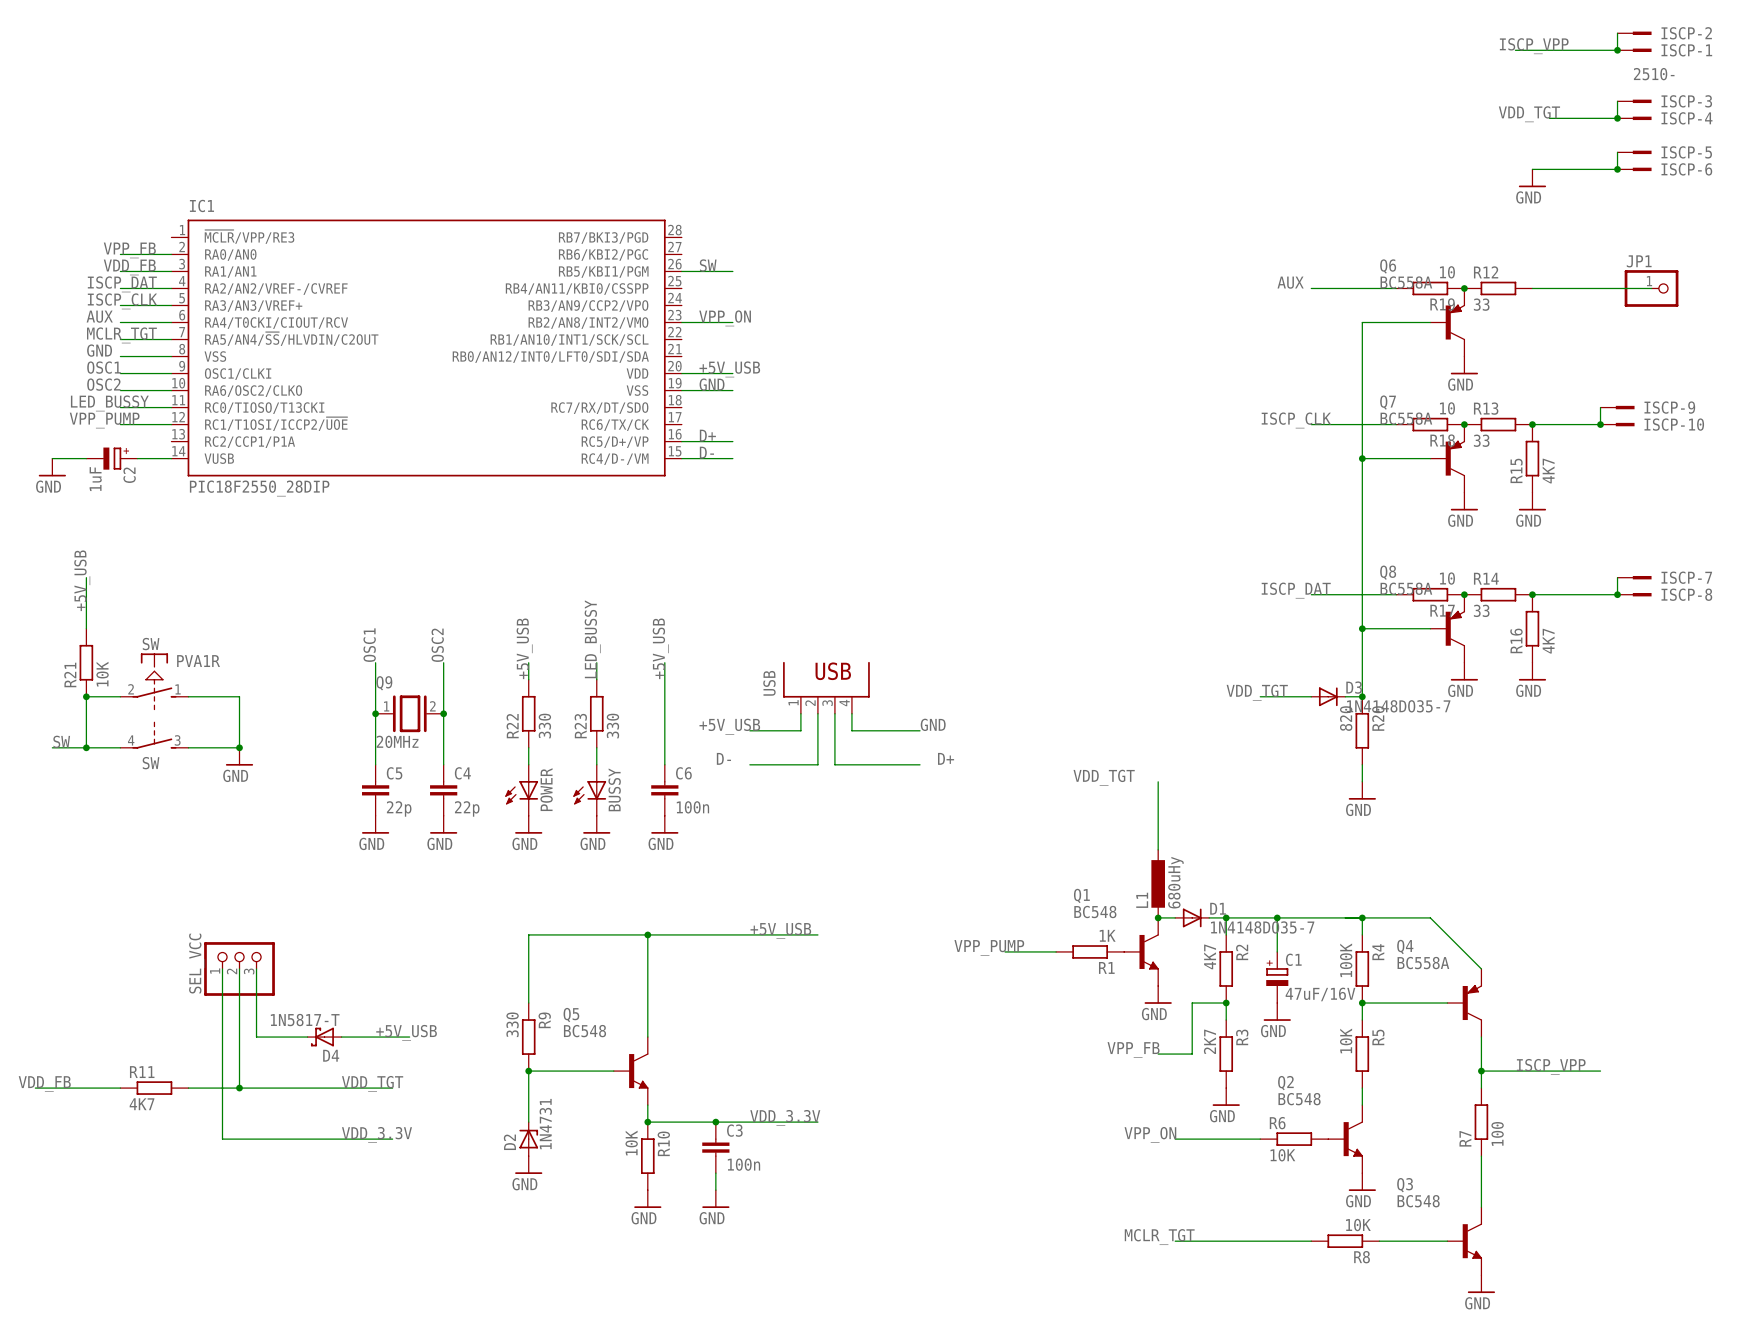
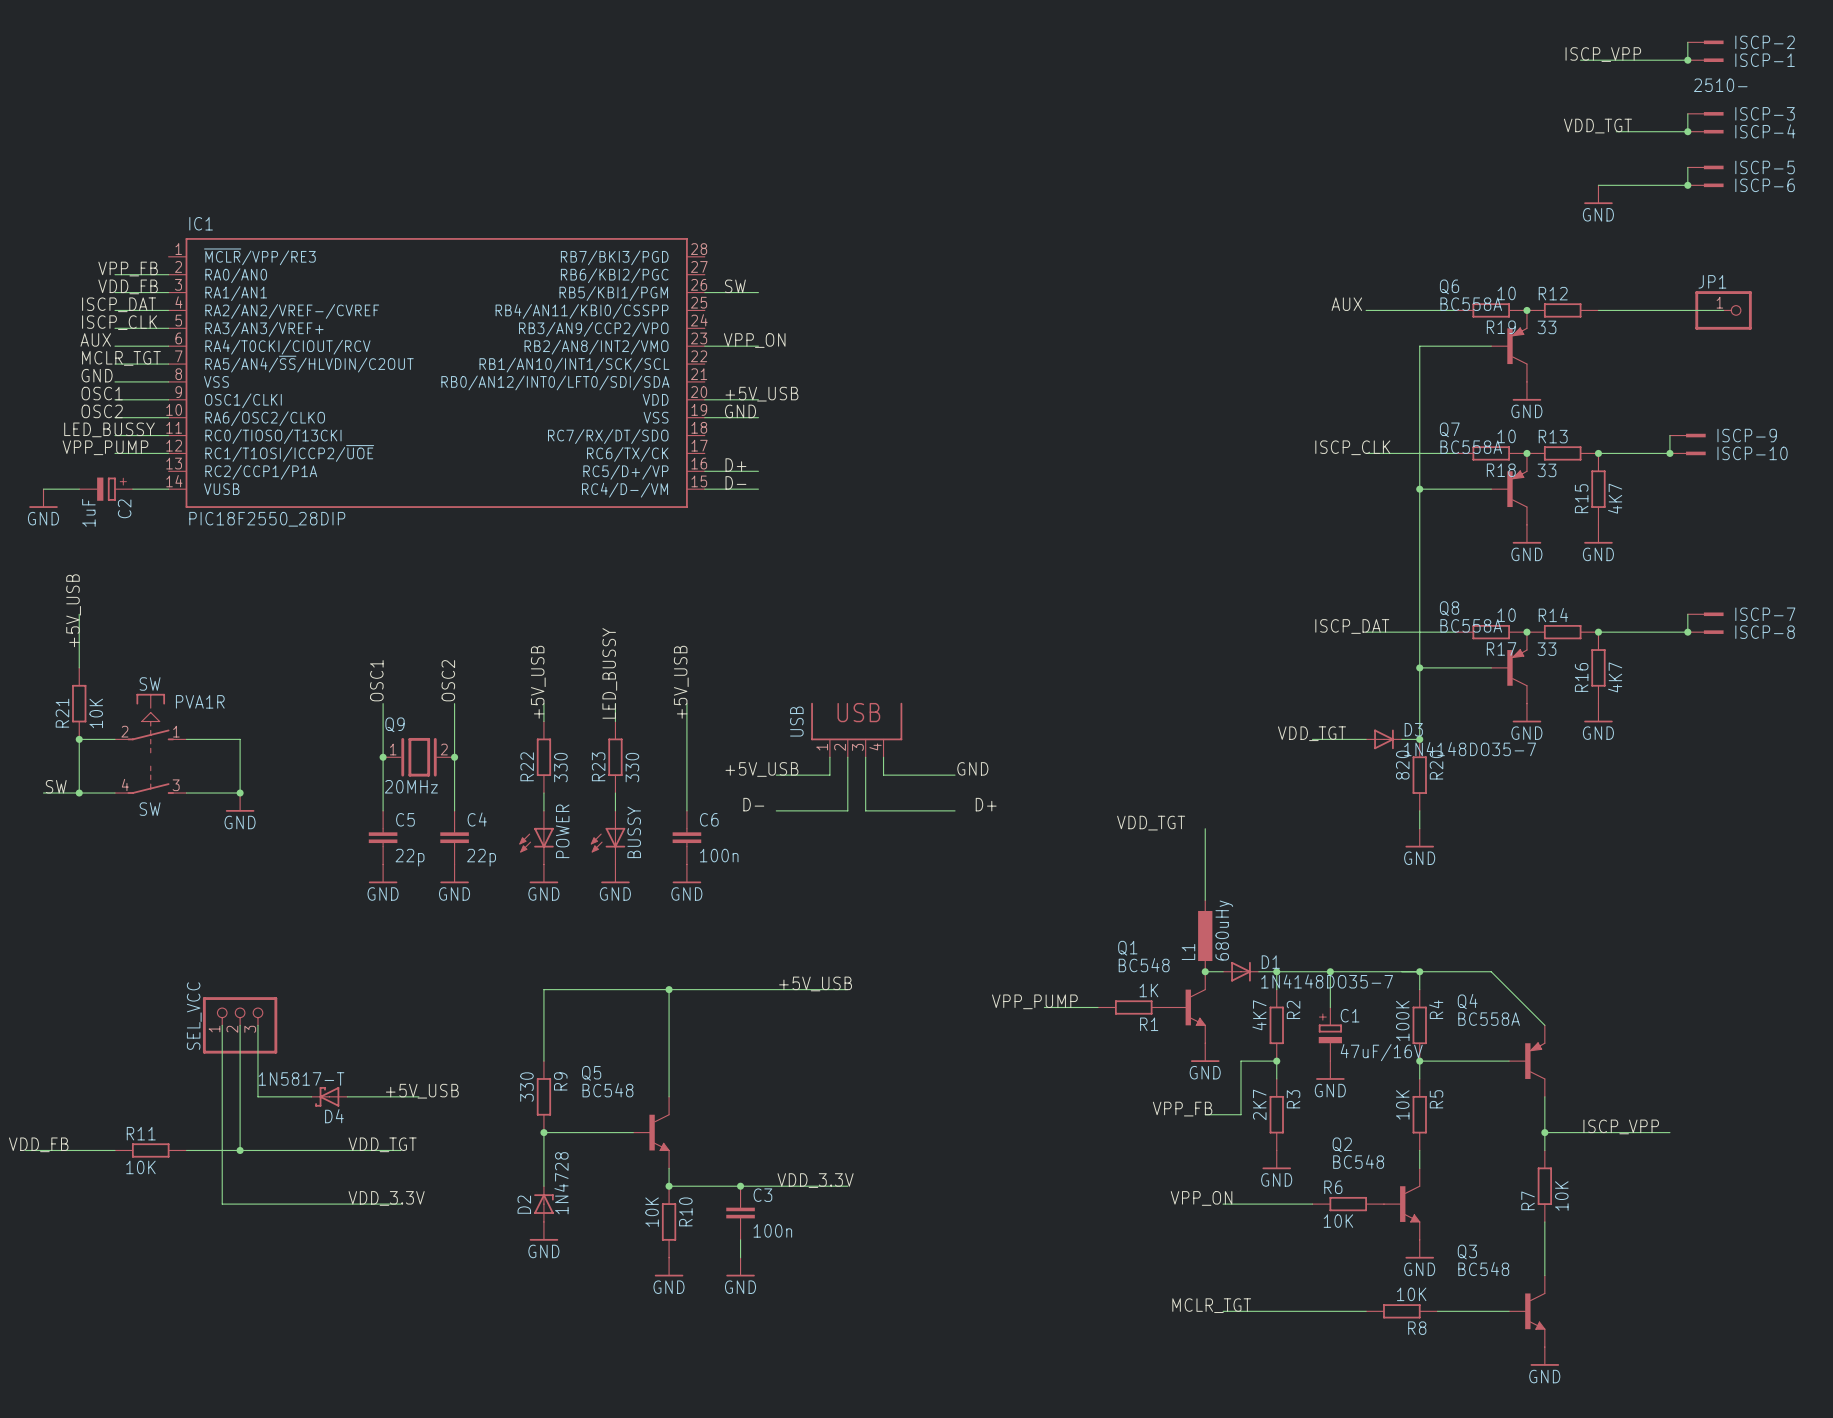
R11 value: 4K7 (142, 1104) -> 10K (140, 1167)
D2 value: 1N4731 (545, 1124) -> 1N4728 (561, 1183)
R7 value: 100 (1497, 1133) -> 10K (1561, 1196)

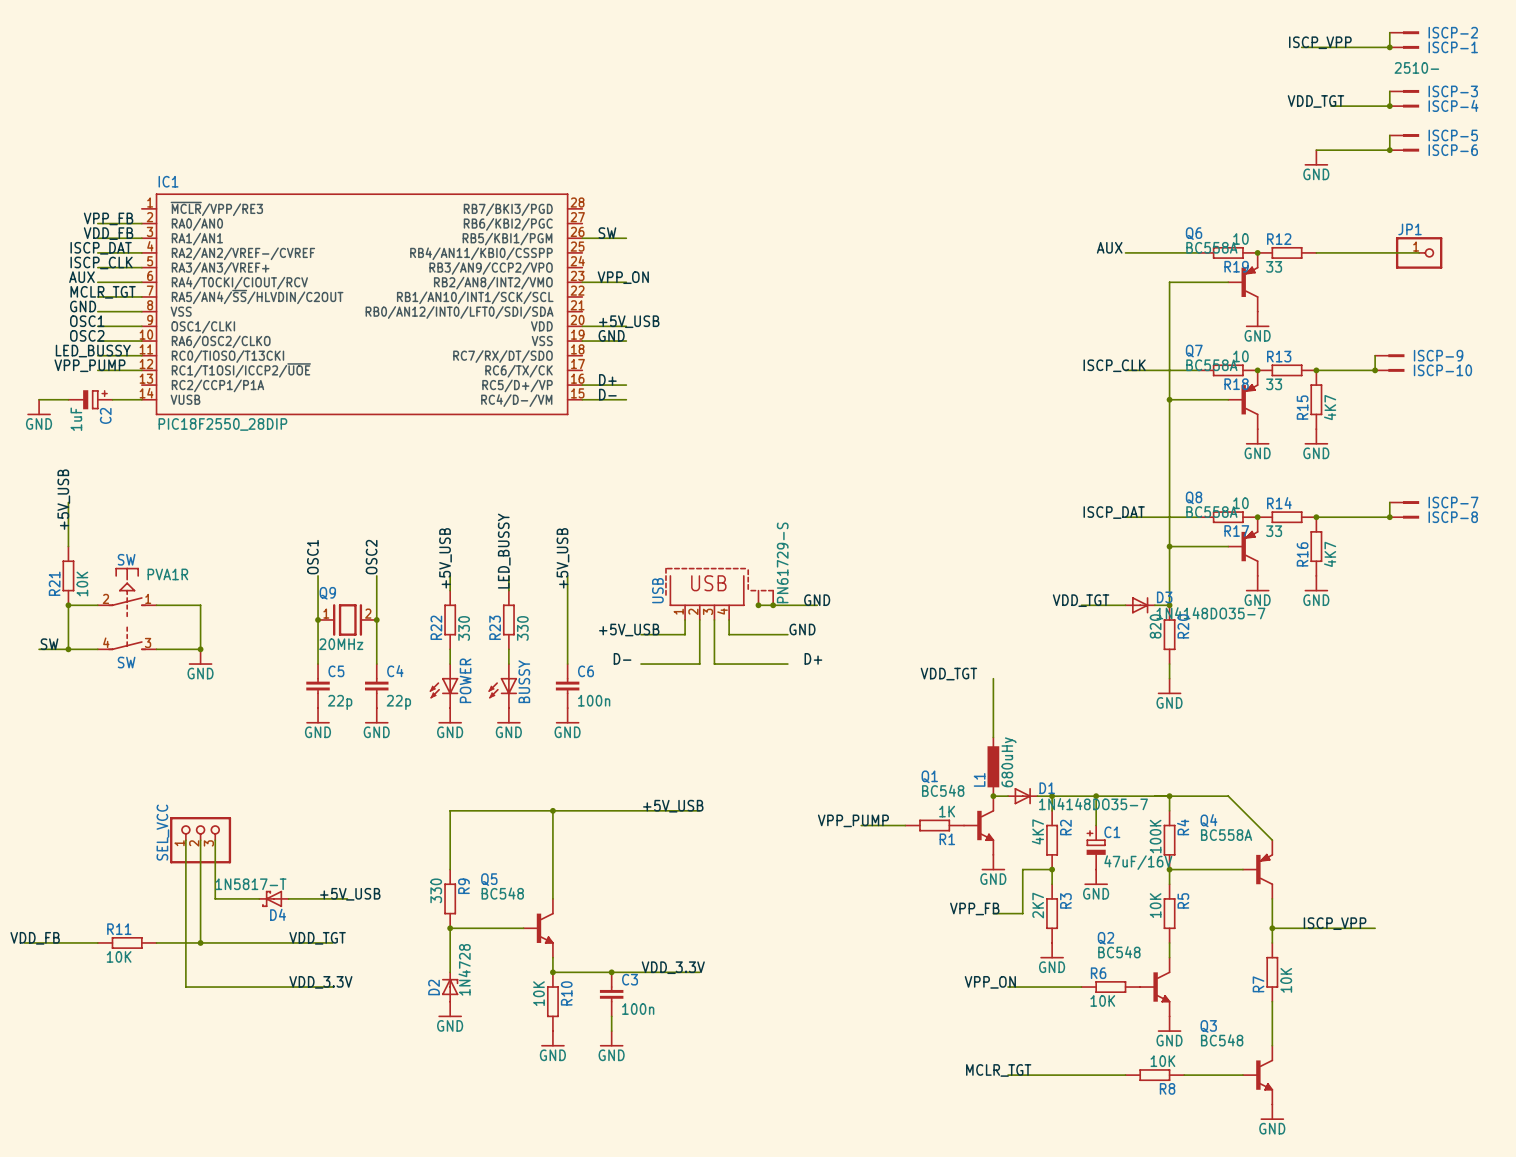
USB: none -> PN61729-S (719, 594)
USB: (856, 730) -> none
label: none -> GND (817, 600)
wire: none -> (758, 605) (817, 605)
junction: none -> (758, 605)
junction: none -> (773, 605)

